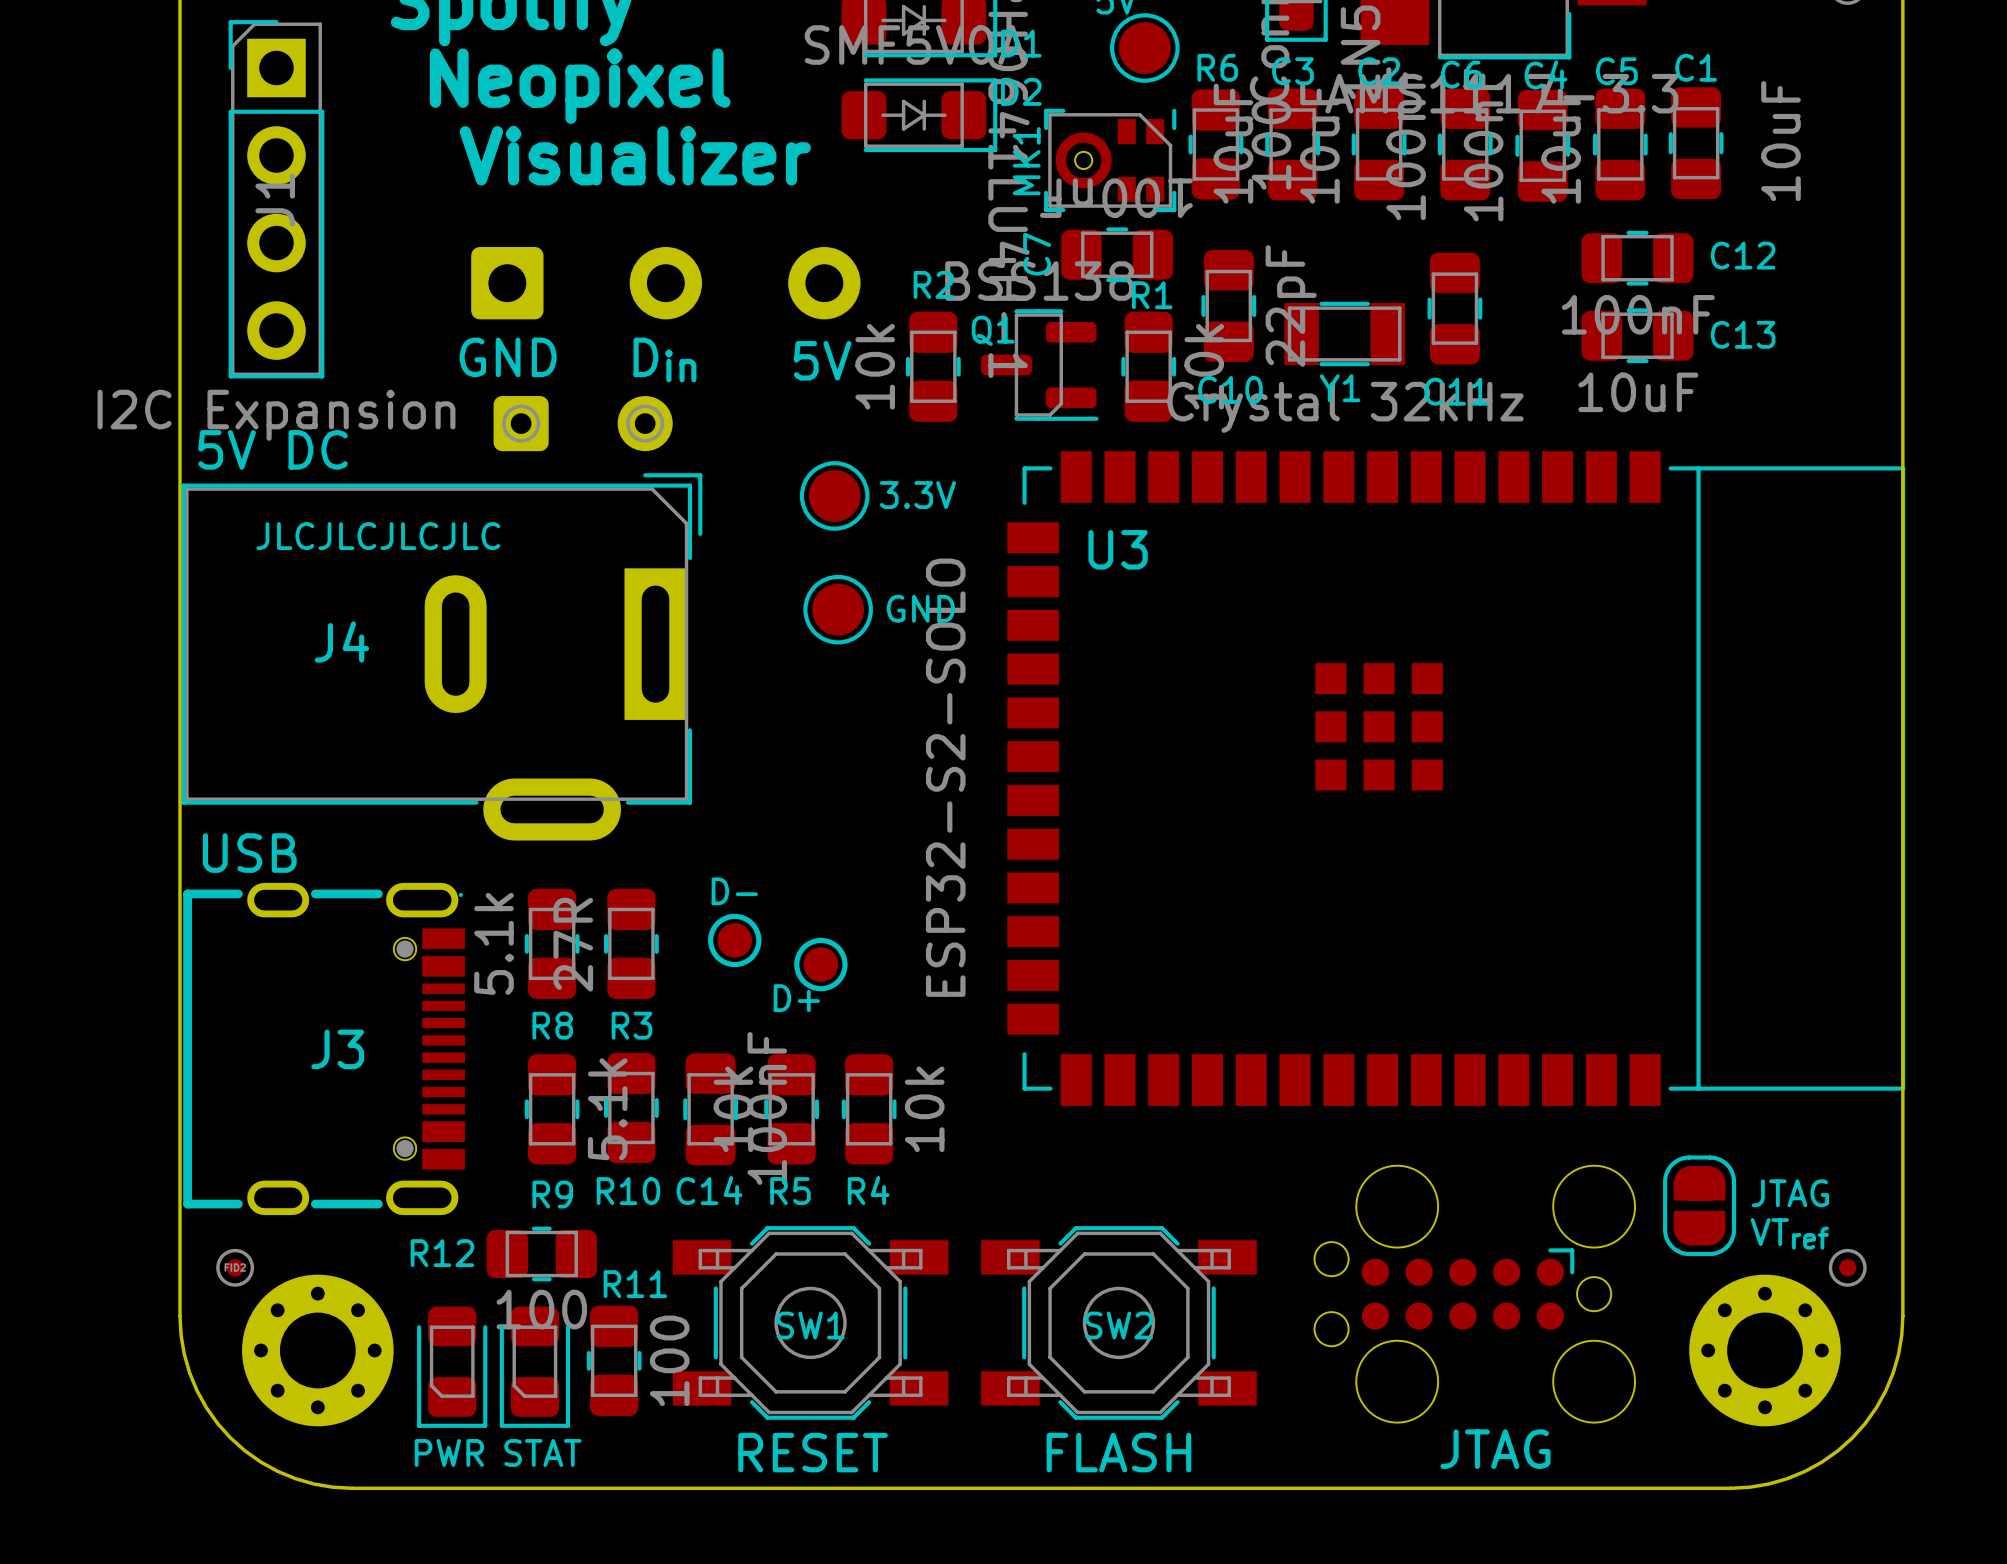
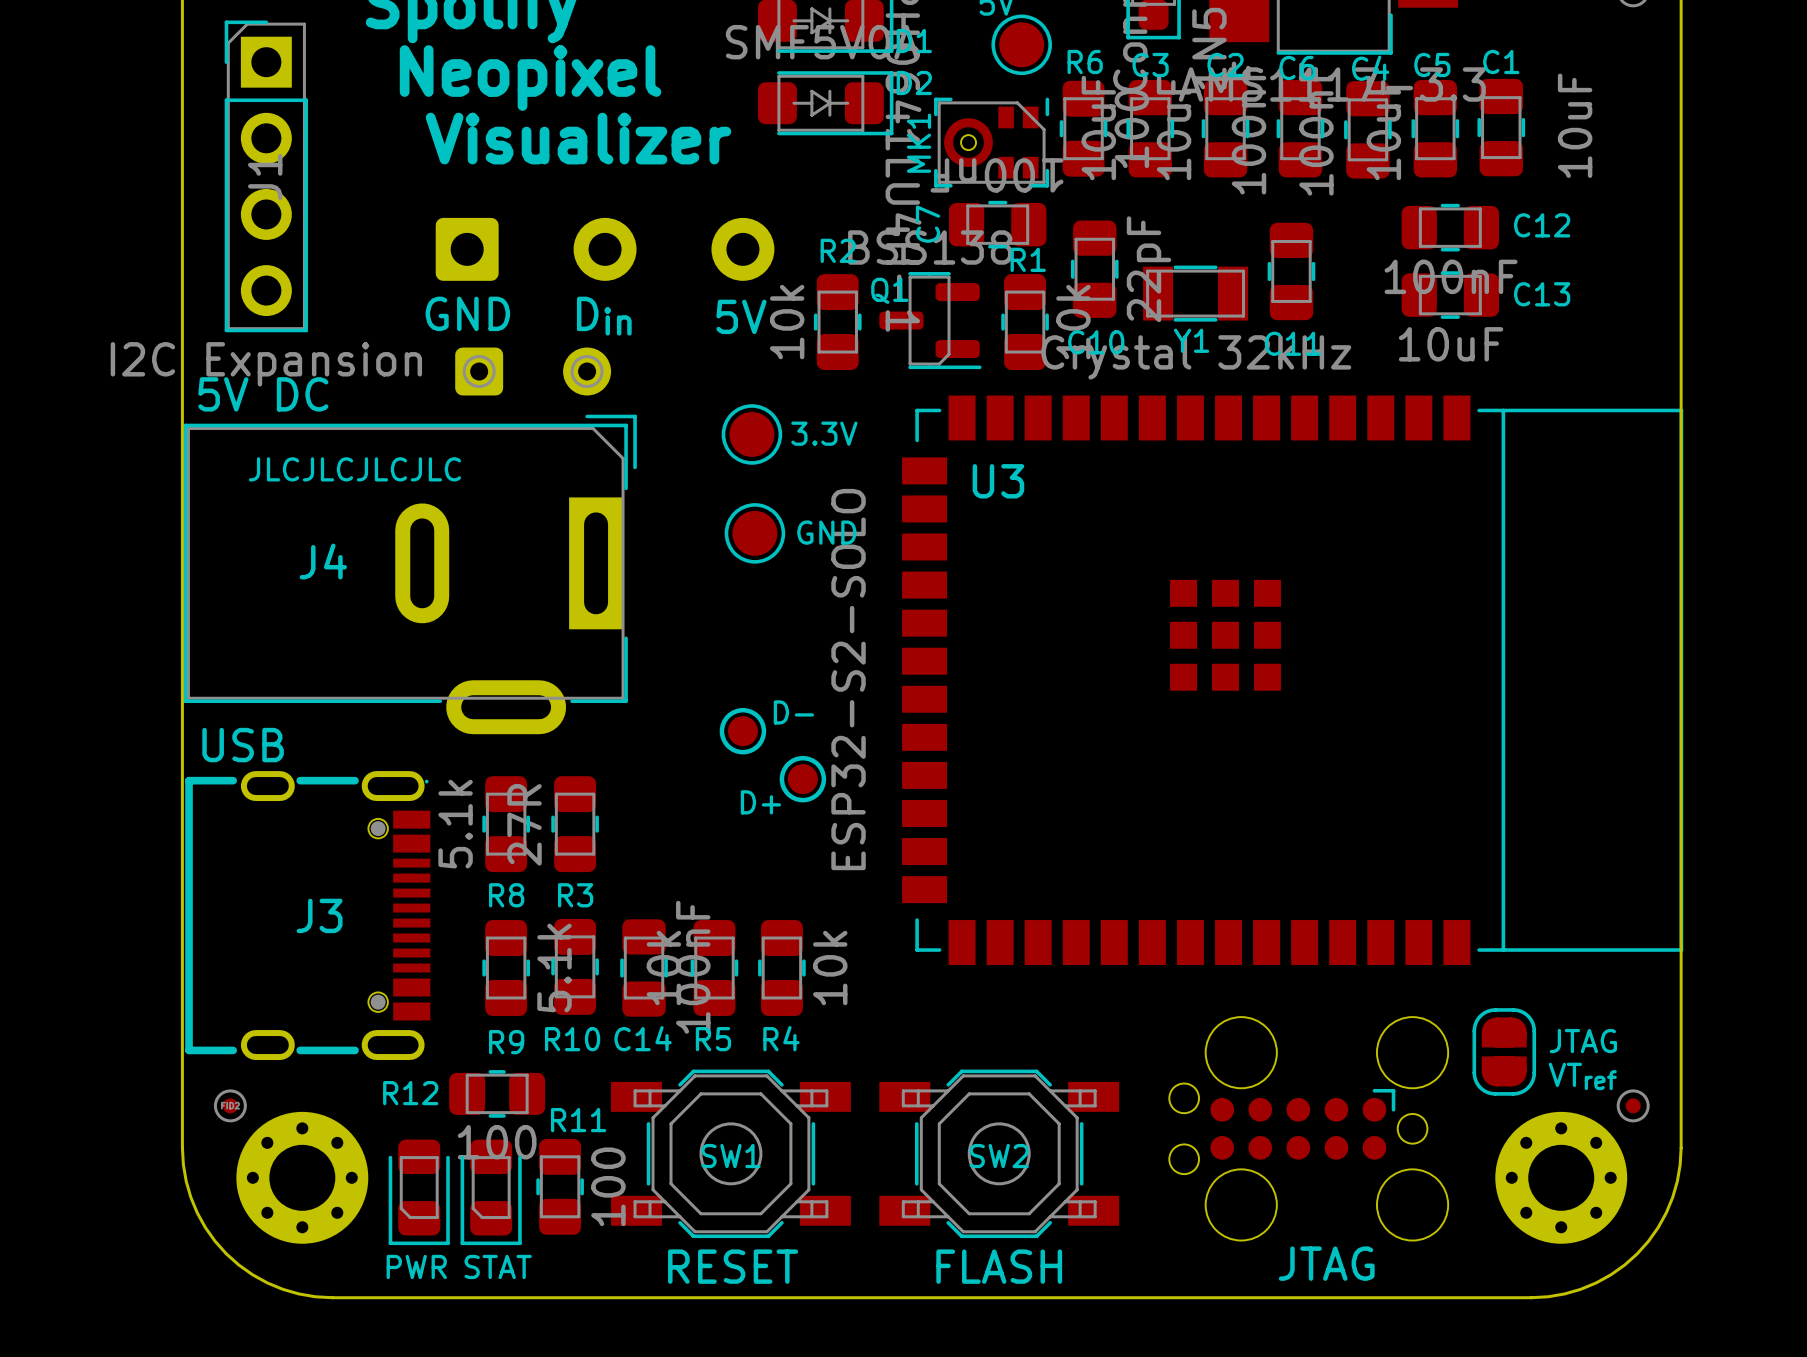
part value position: D- (734, 891) -> D- (793, 712)
part position: (734, 940) -> (742, 731)
part position: (820, 964) -> (802, 779)
part value position: D+ (796, 998) -> D+ (760, 802)

